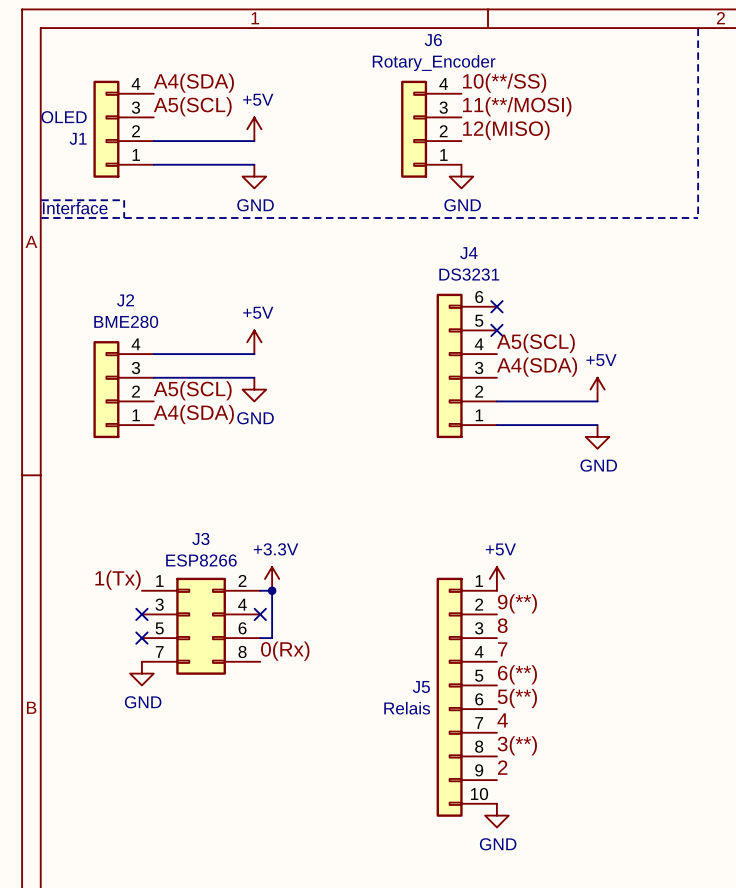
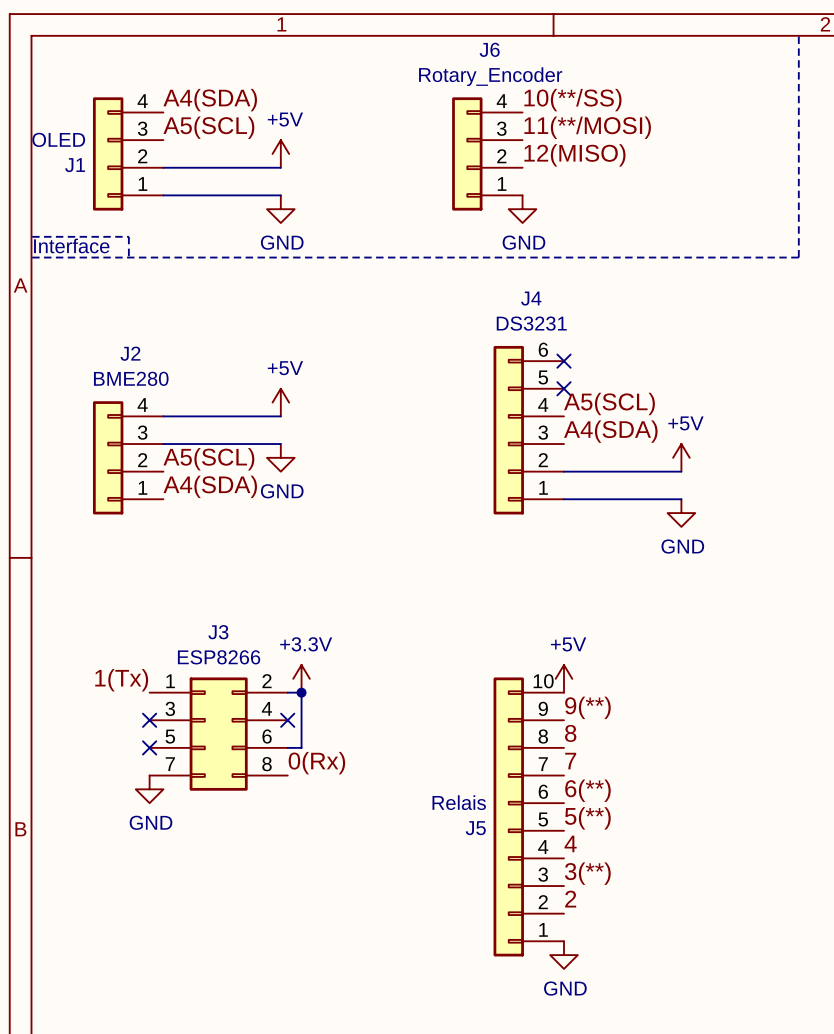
J5 flip: as is (449, 697) -> up-down (508, 816)

